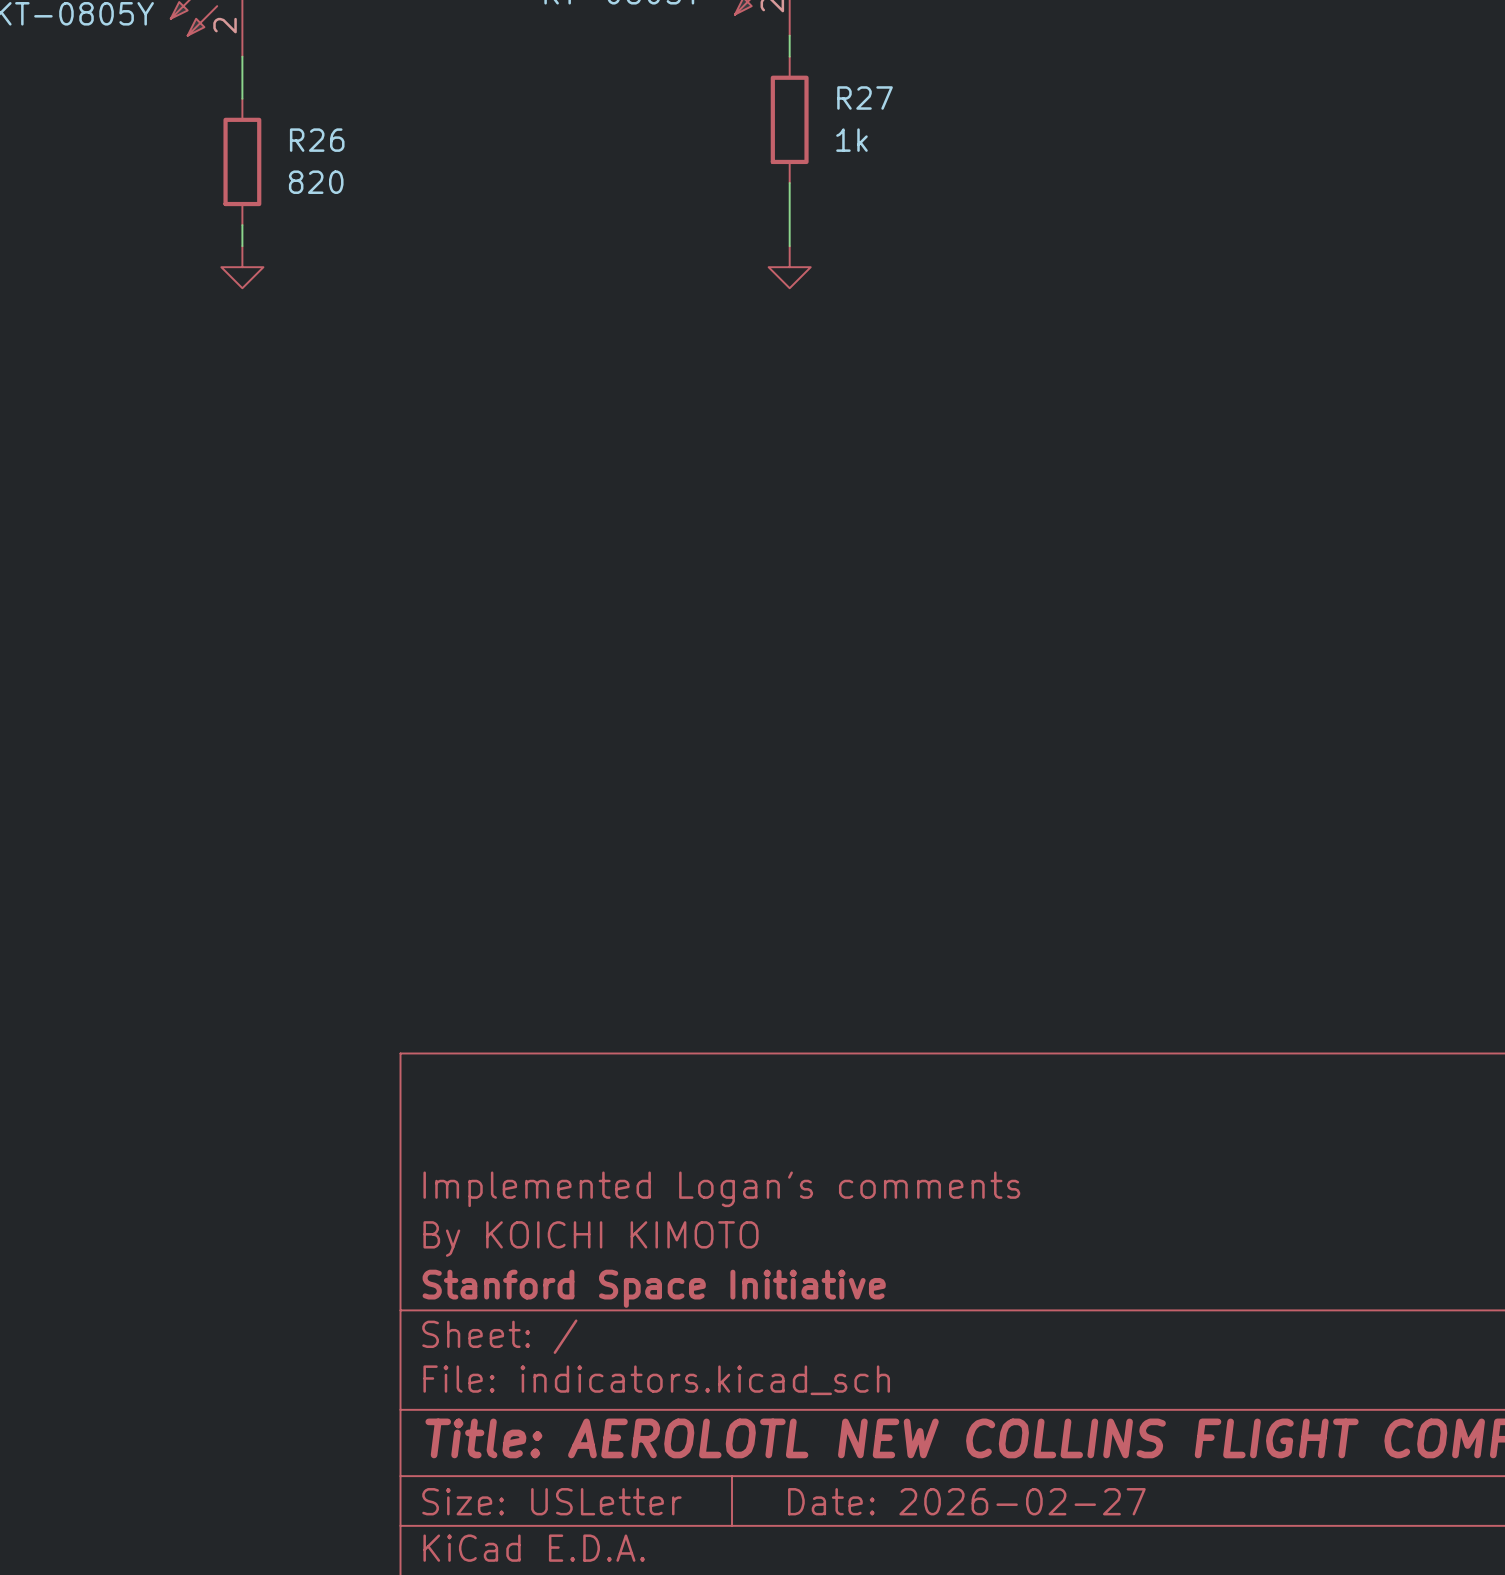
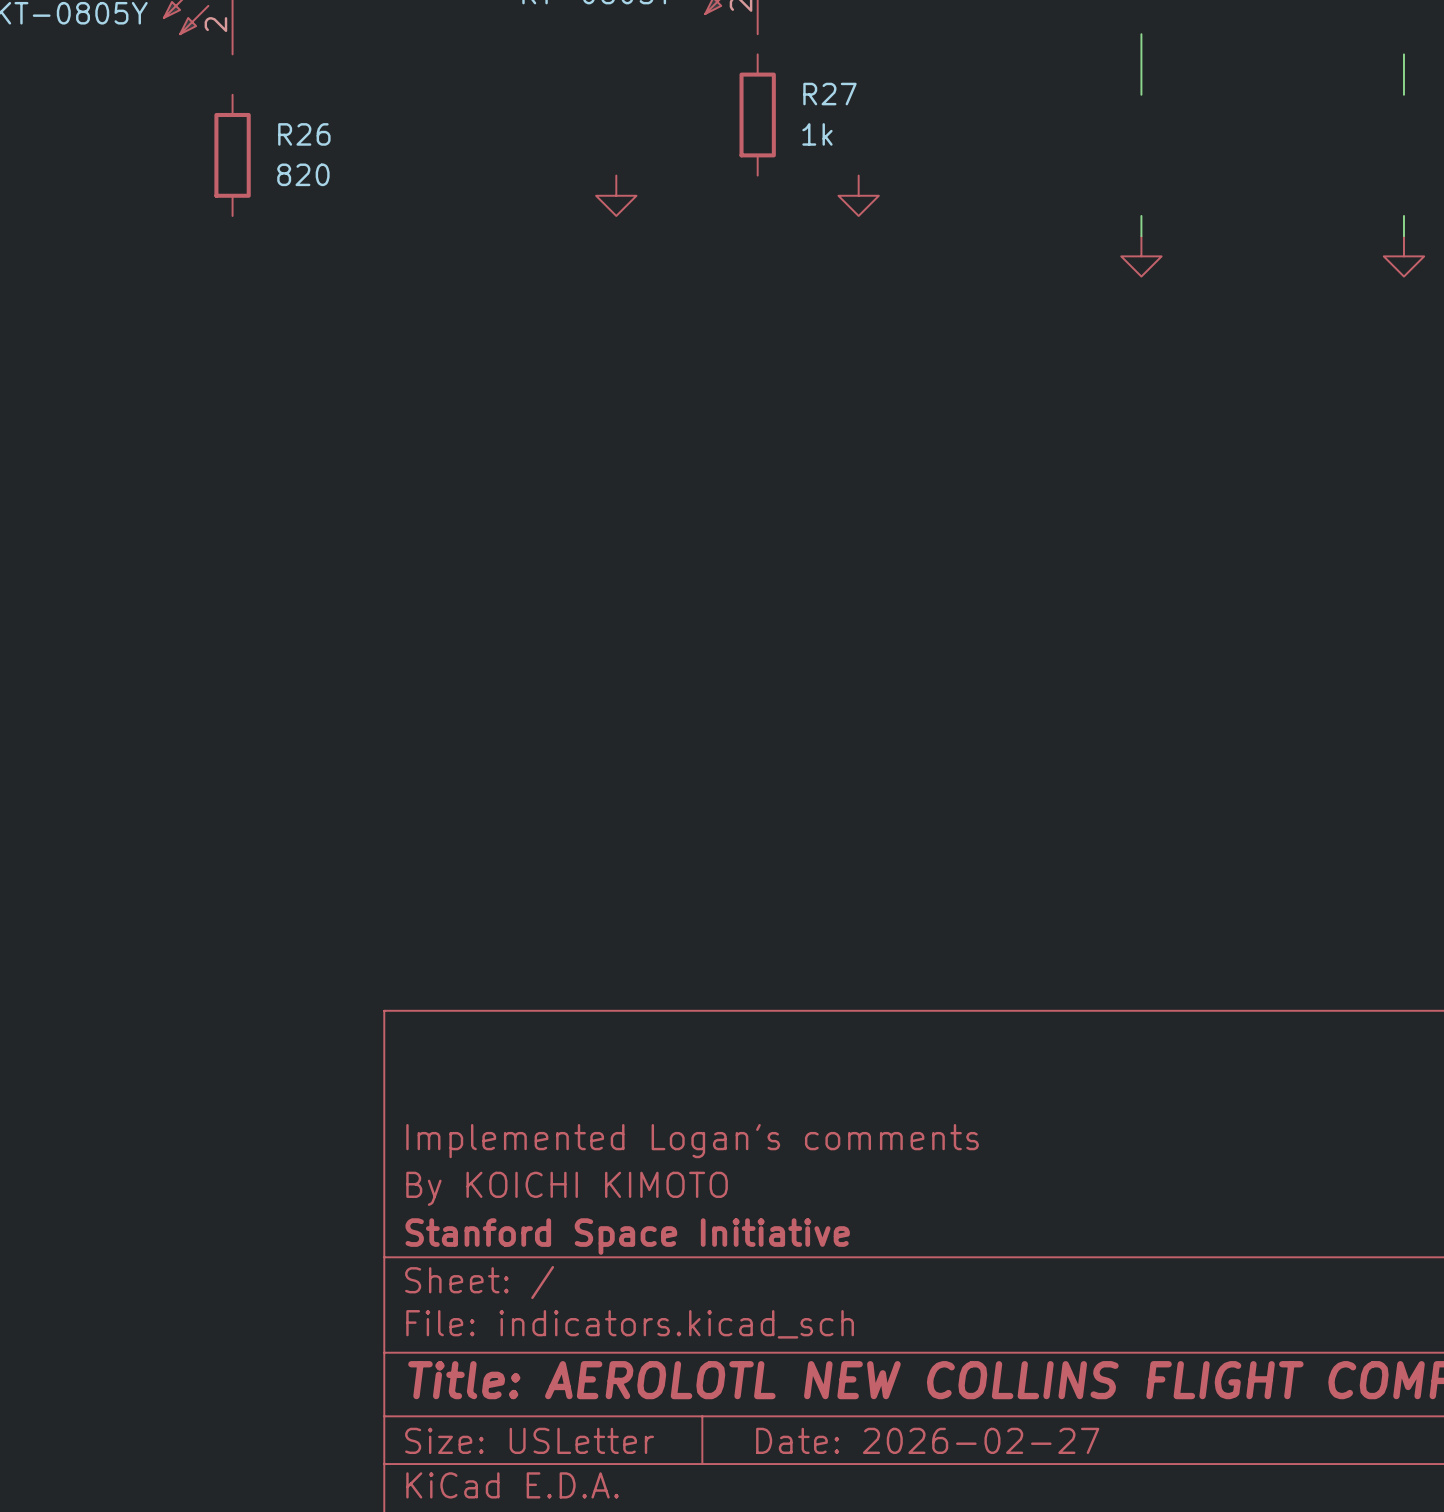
wire: (789, 35) (789, 56) -> none
wire: none -> (1141, 34) (1141, 94)
wire: (242, 56) (242, 98) -> none
wire: none -> (1403, 54) (1403, 94)
wire: (789, 182) (789, 246) -> none
power symbol: none -> (616, 195)
power symbol: none -> (858, 195)
wire: (242, 225) (242, 246) -> none
wire: none -> (1141, 215) (1141, 236)
wire: none -> (1403, 215) (1403, 236)
power symbol: (242, 267) -> none
power symbol: (789, 267) -> none
power symbol: none -> (1141, 256)
power symbol: none -> (1403, 256)

